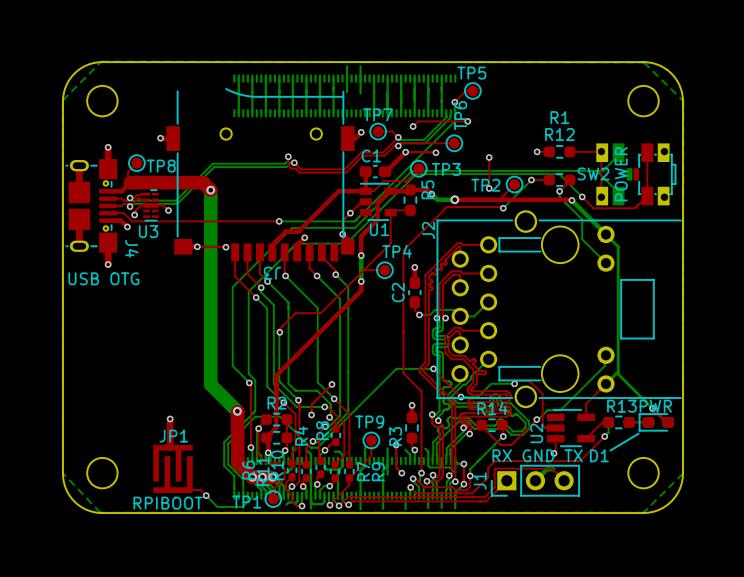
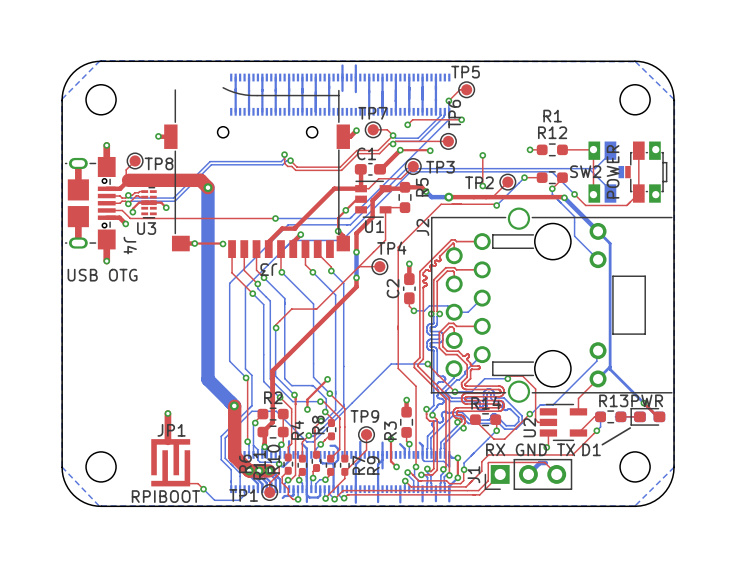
top track: (258, 428) (258, 454) (266, 462) (278, 462) (284, 468) (282, 480) -> (279, 464) (279, 473)
bottom track: none -> (257, 454) (259, 462) (277, 462) (279, 464)
via: none -> (279, 464)

